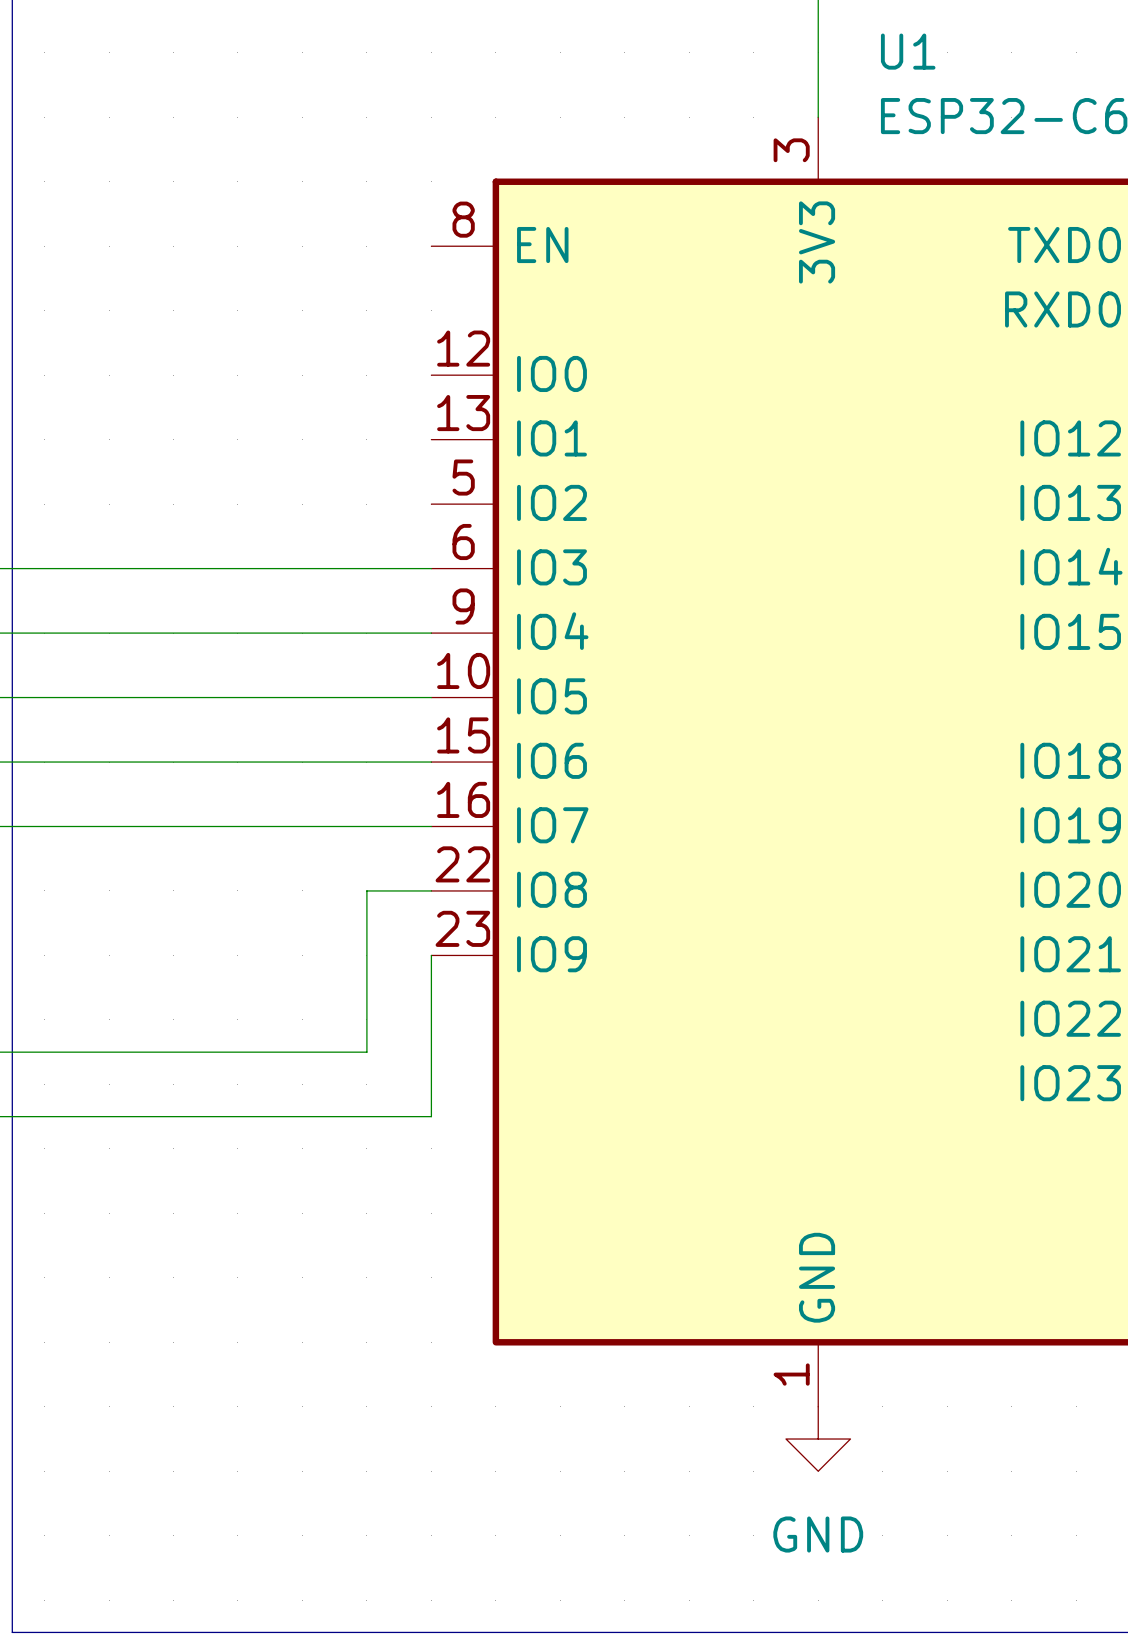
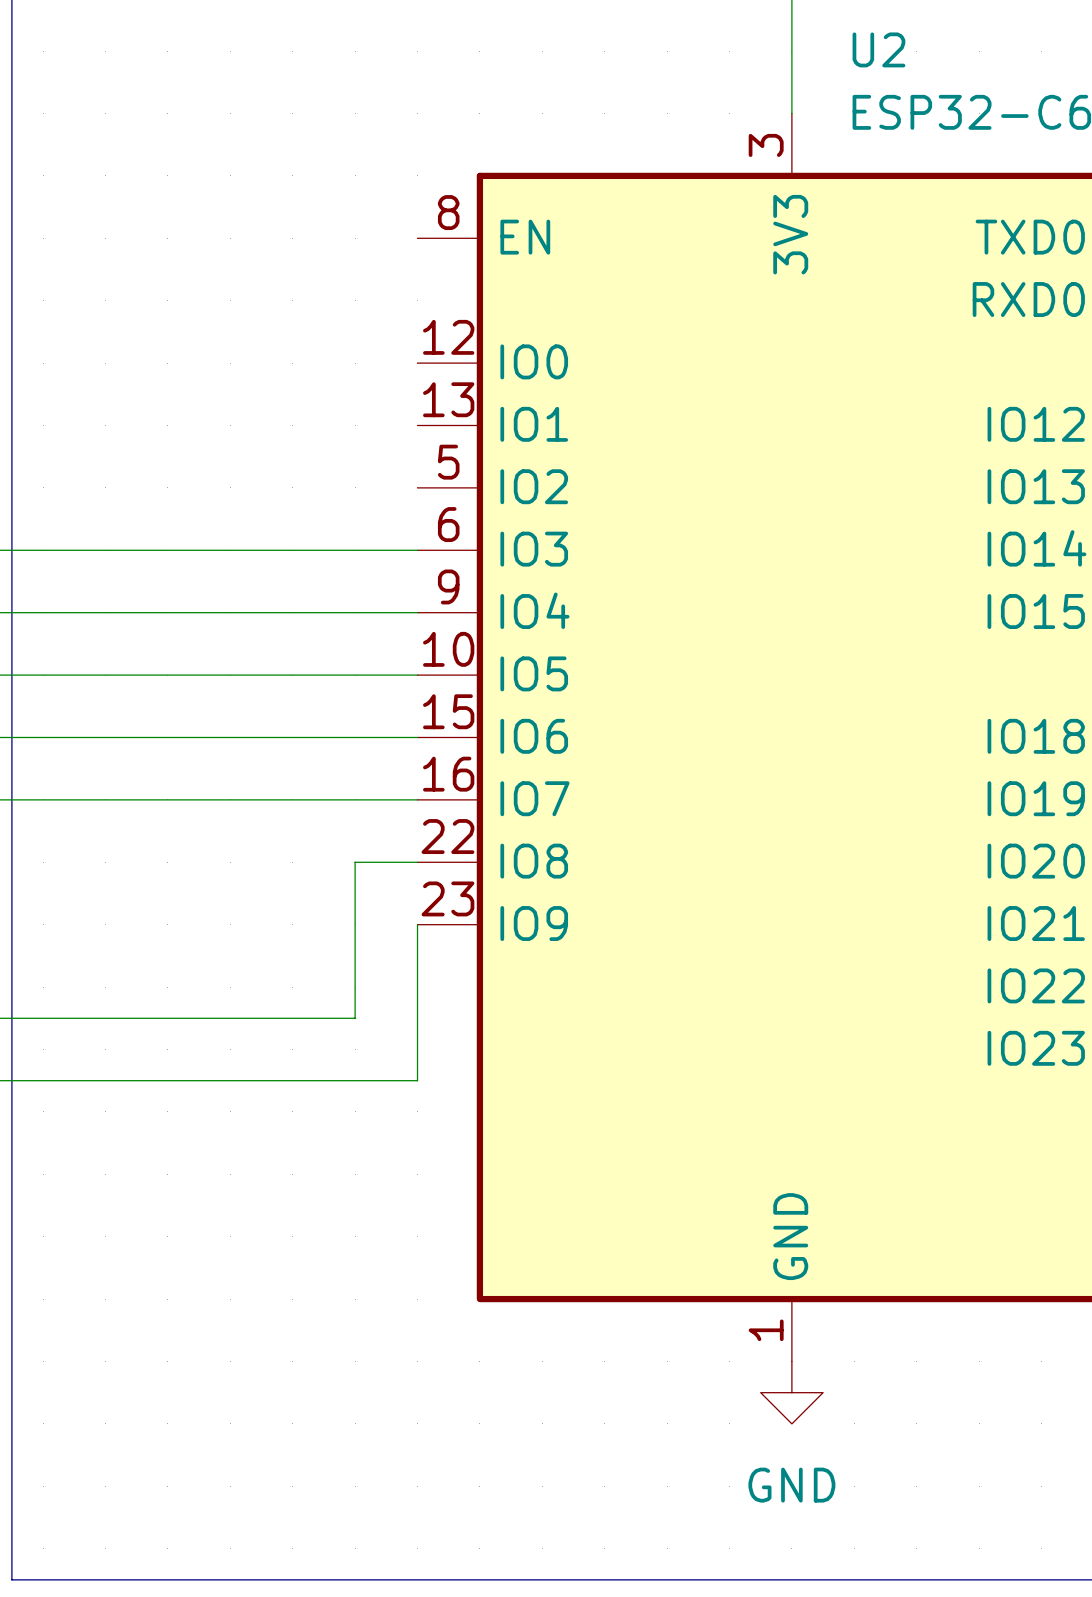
U1 name: U1 (908, 51) -> U2 (878, 49)

